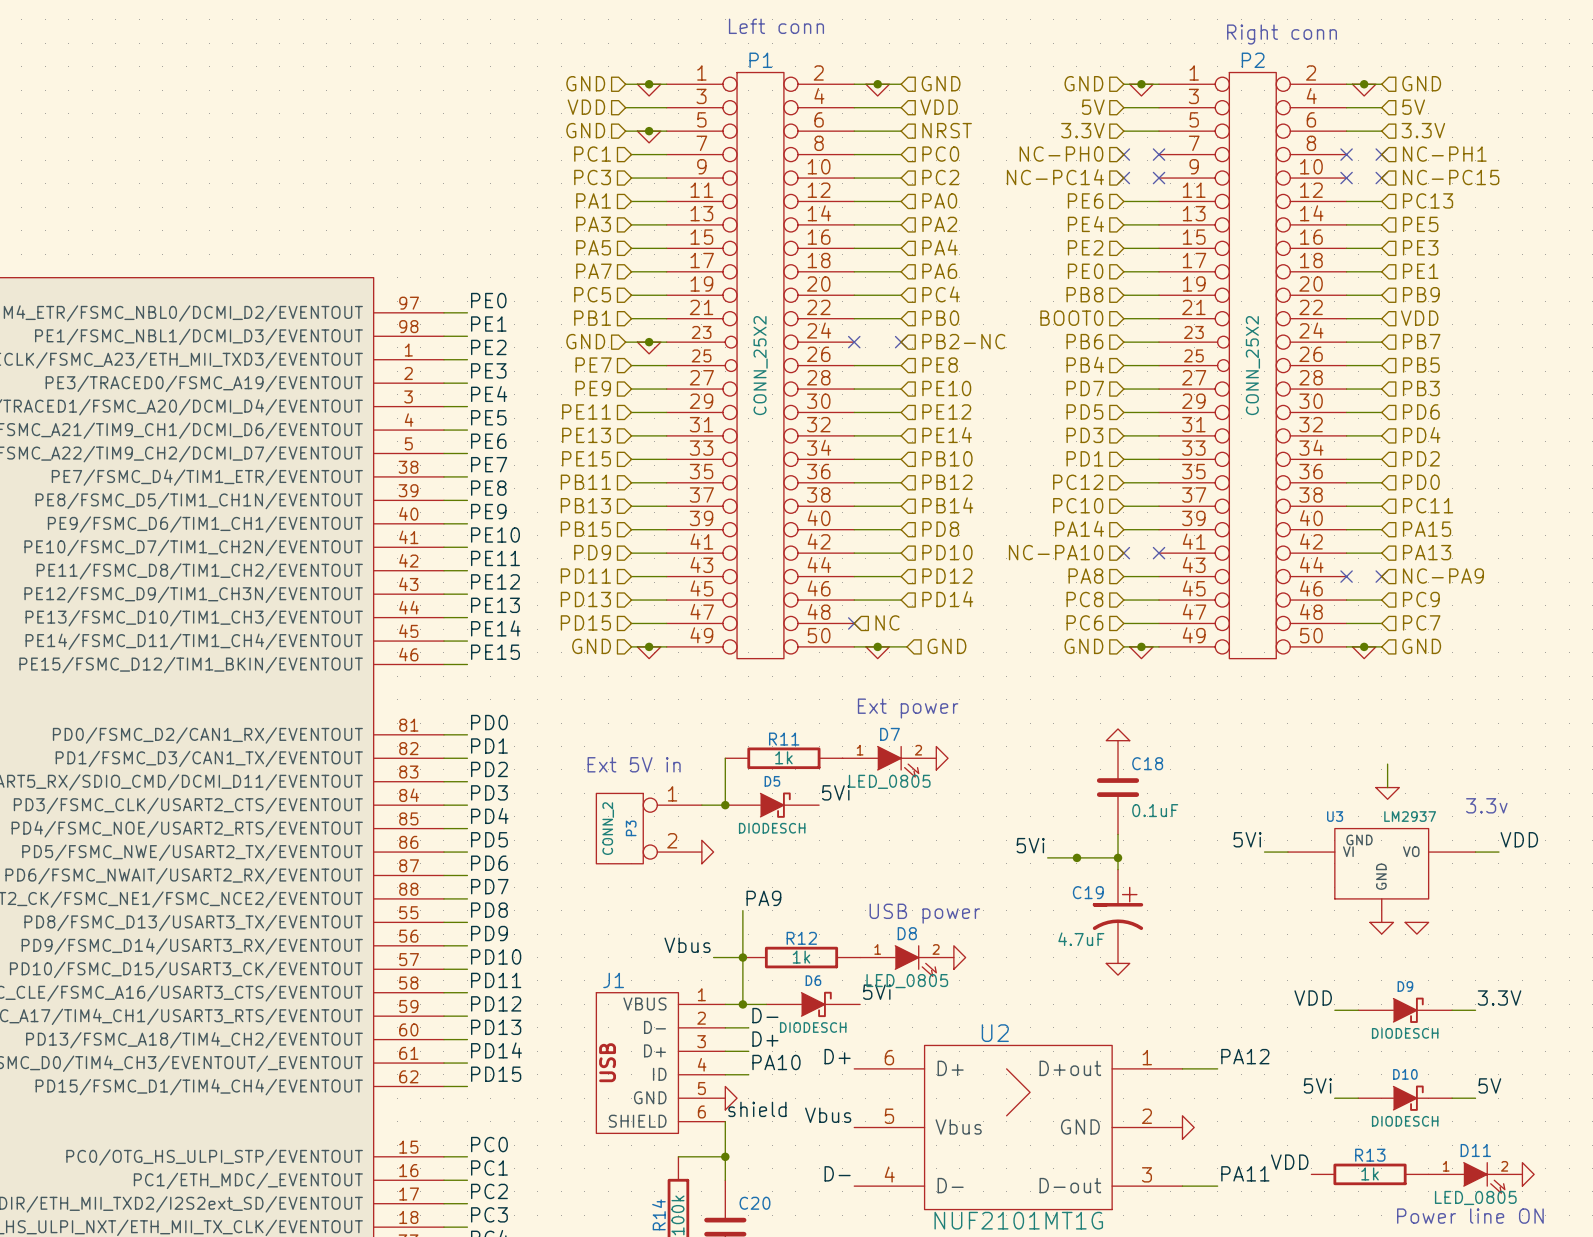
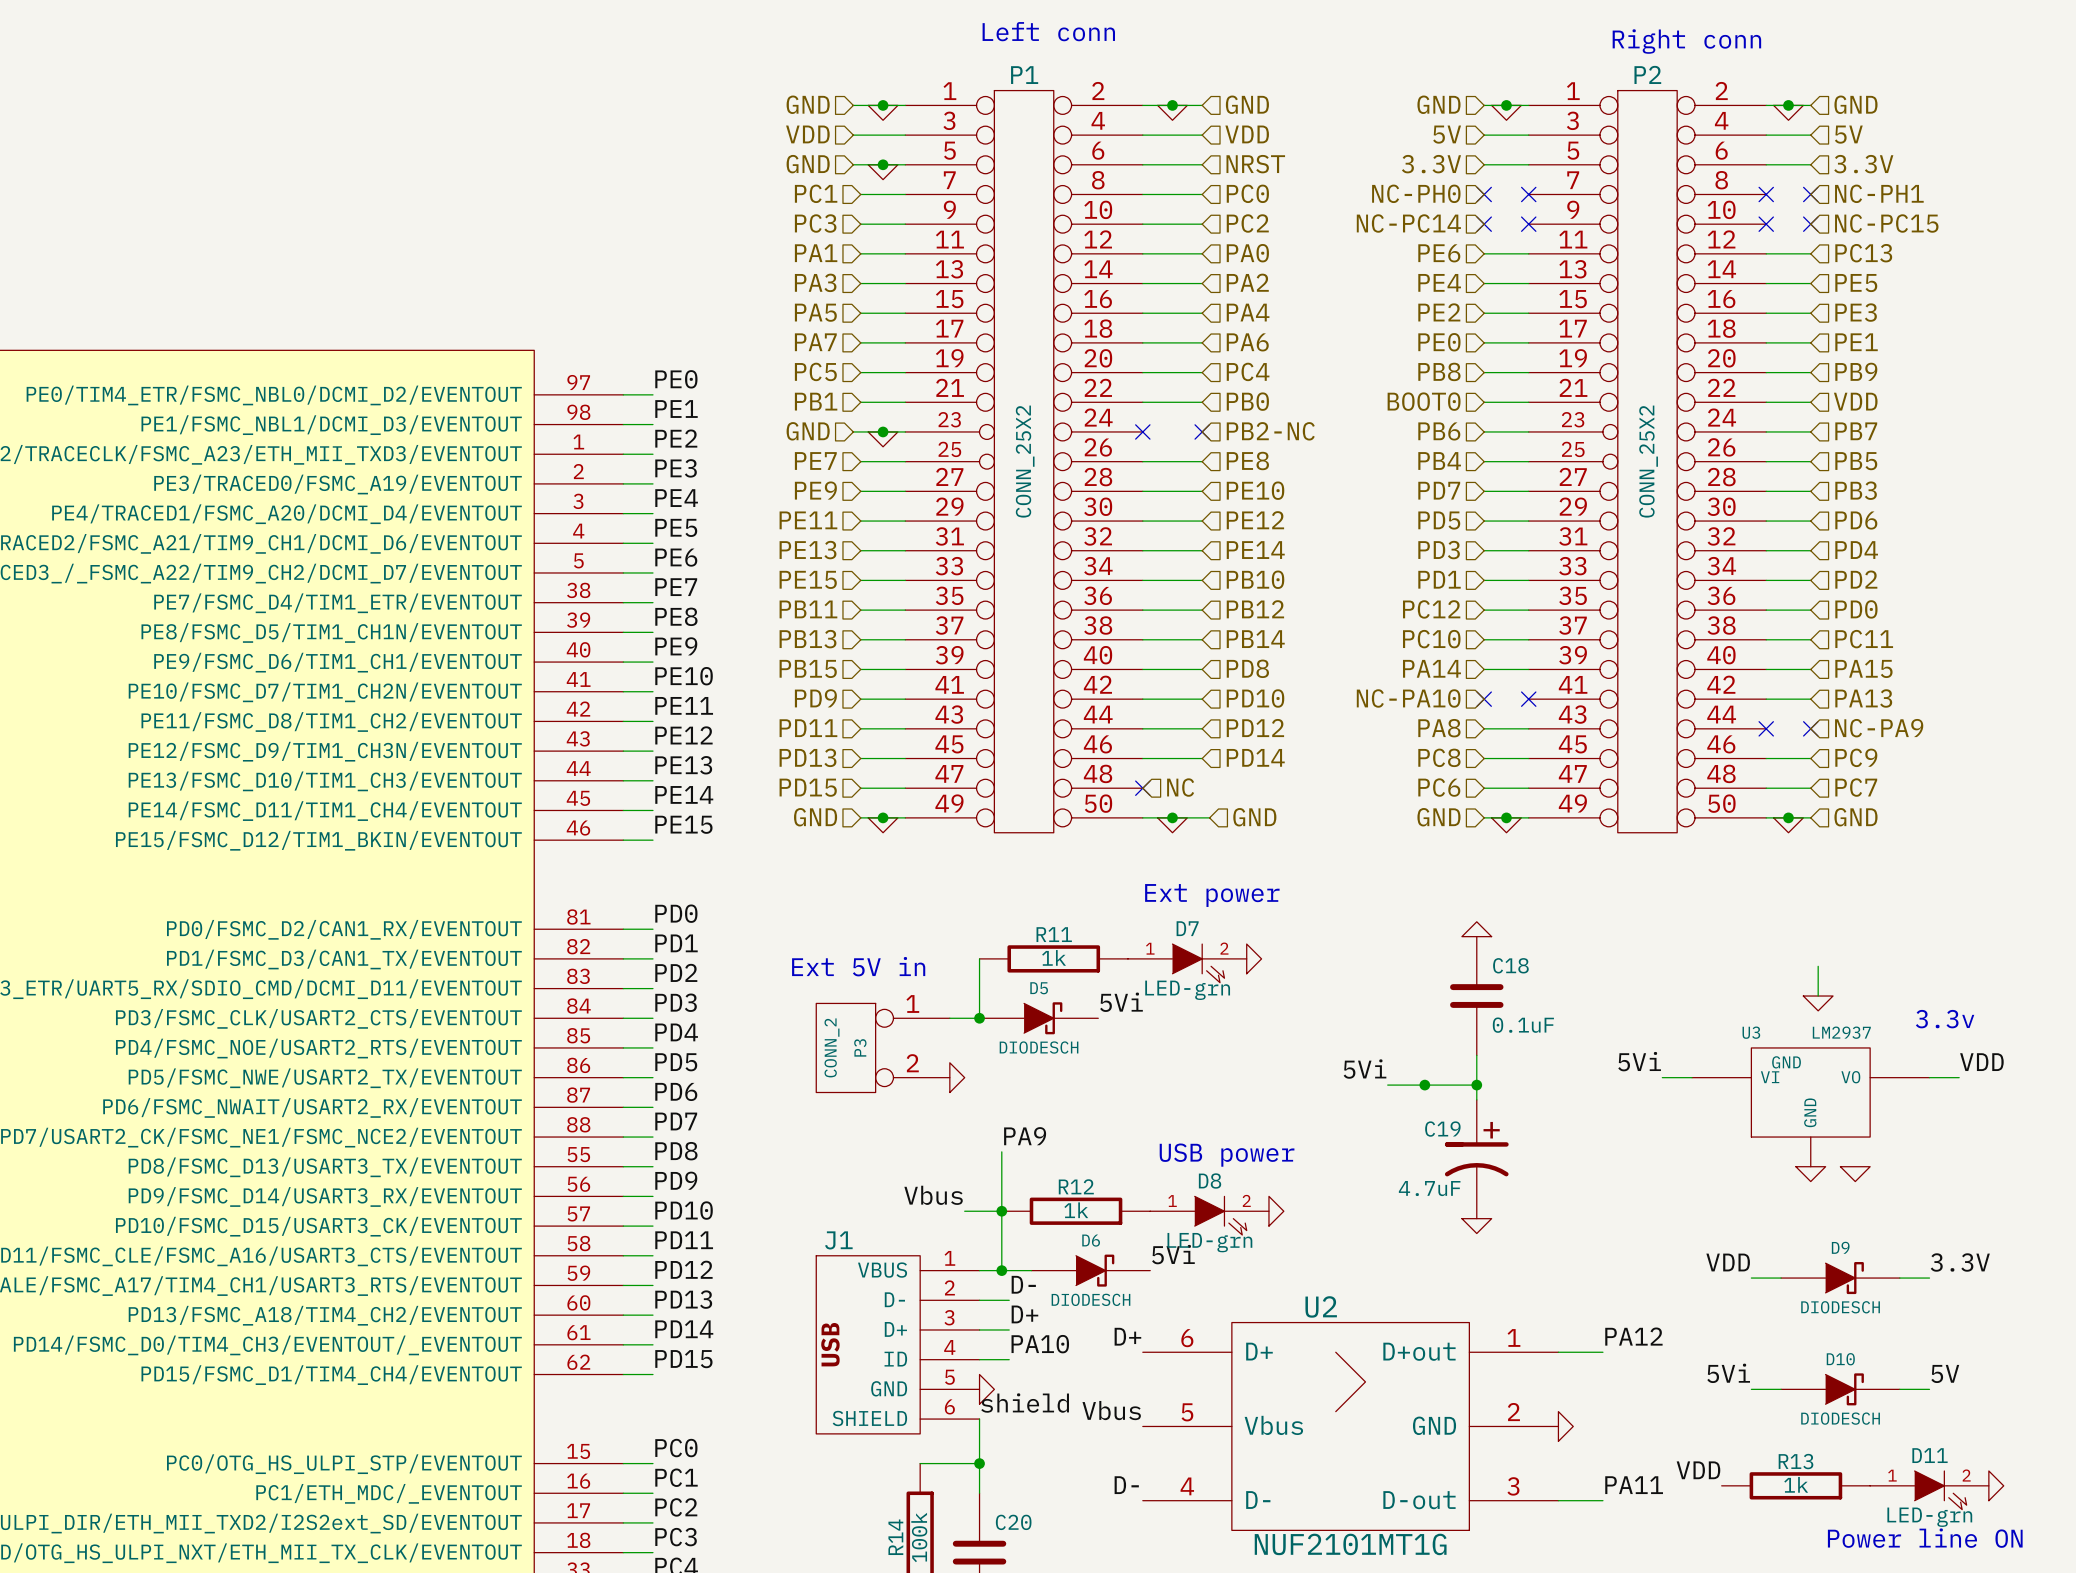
D7 value: LED_0805 (889, 781) -> LED-grn (1187, 990)
D8 value: LED_0805 (907, 981) -> LED-grn (1209, 1242)
D11 value: LED_0805 (1475, 1197) -> LED-grn (1929, 1517)

